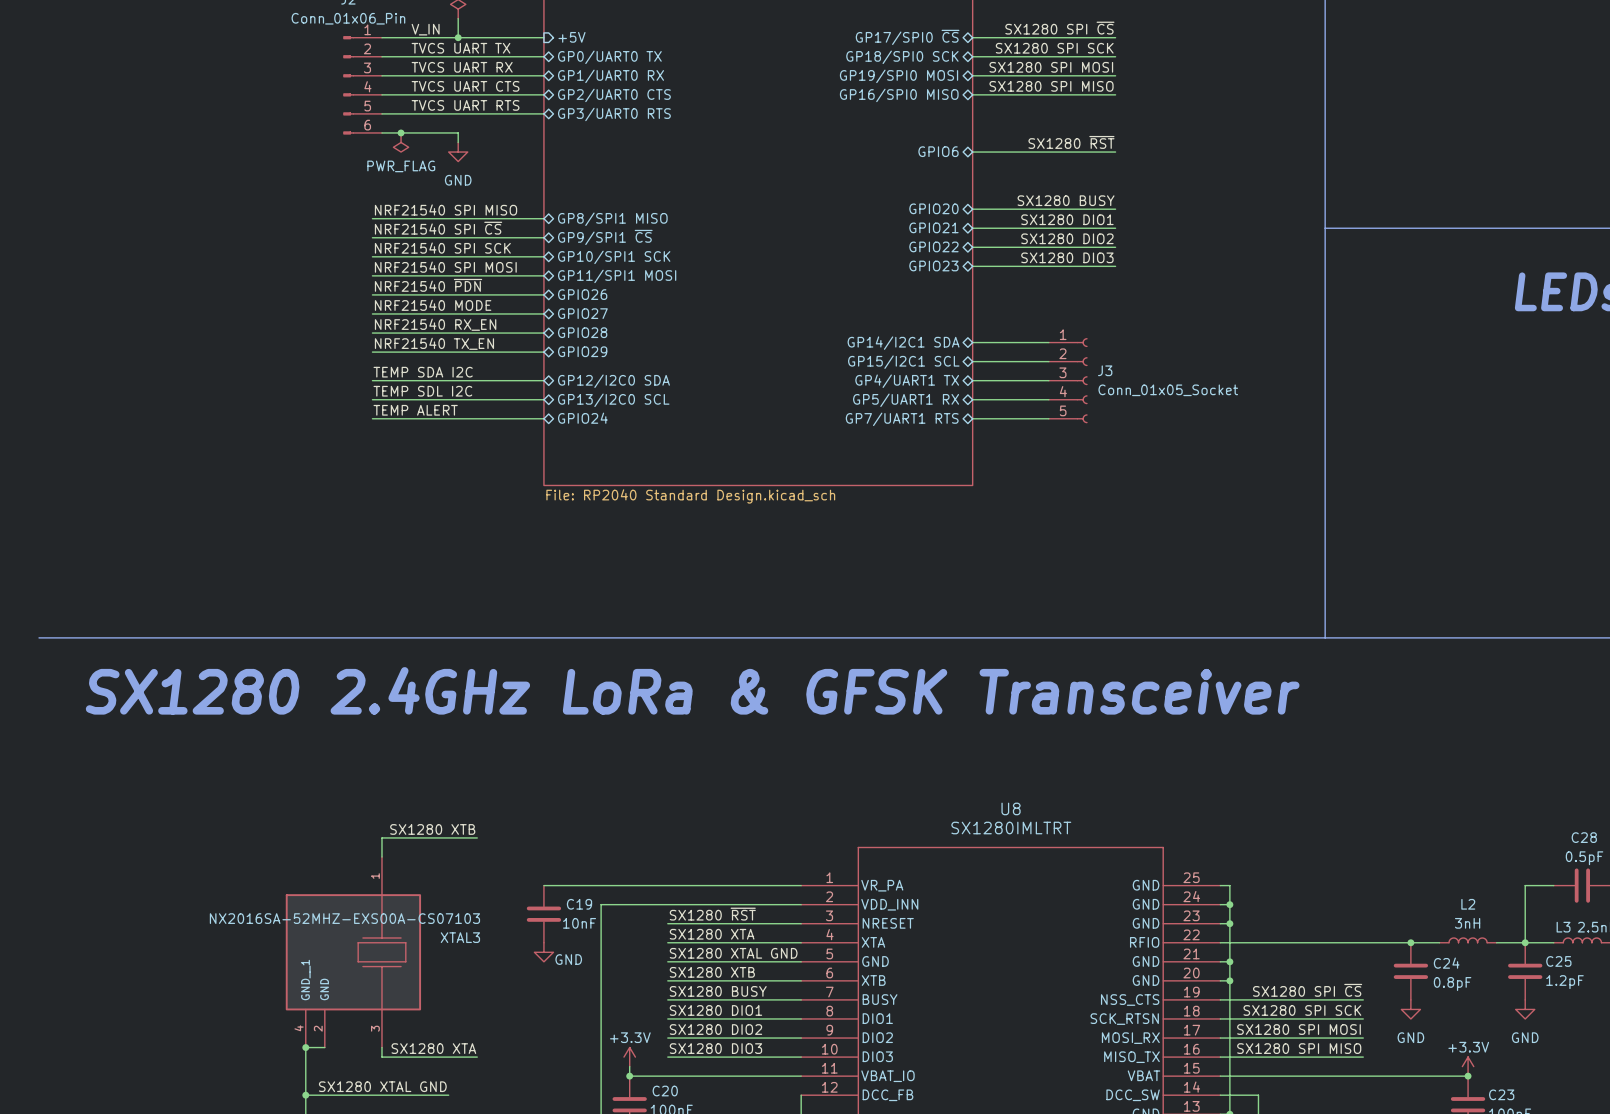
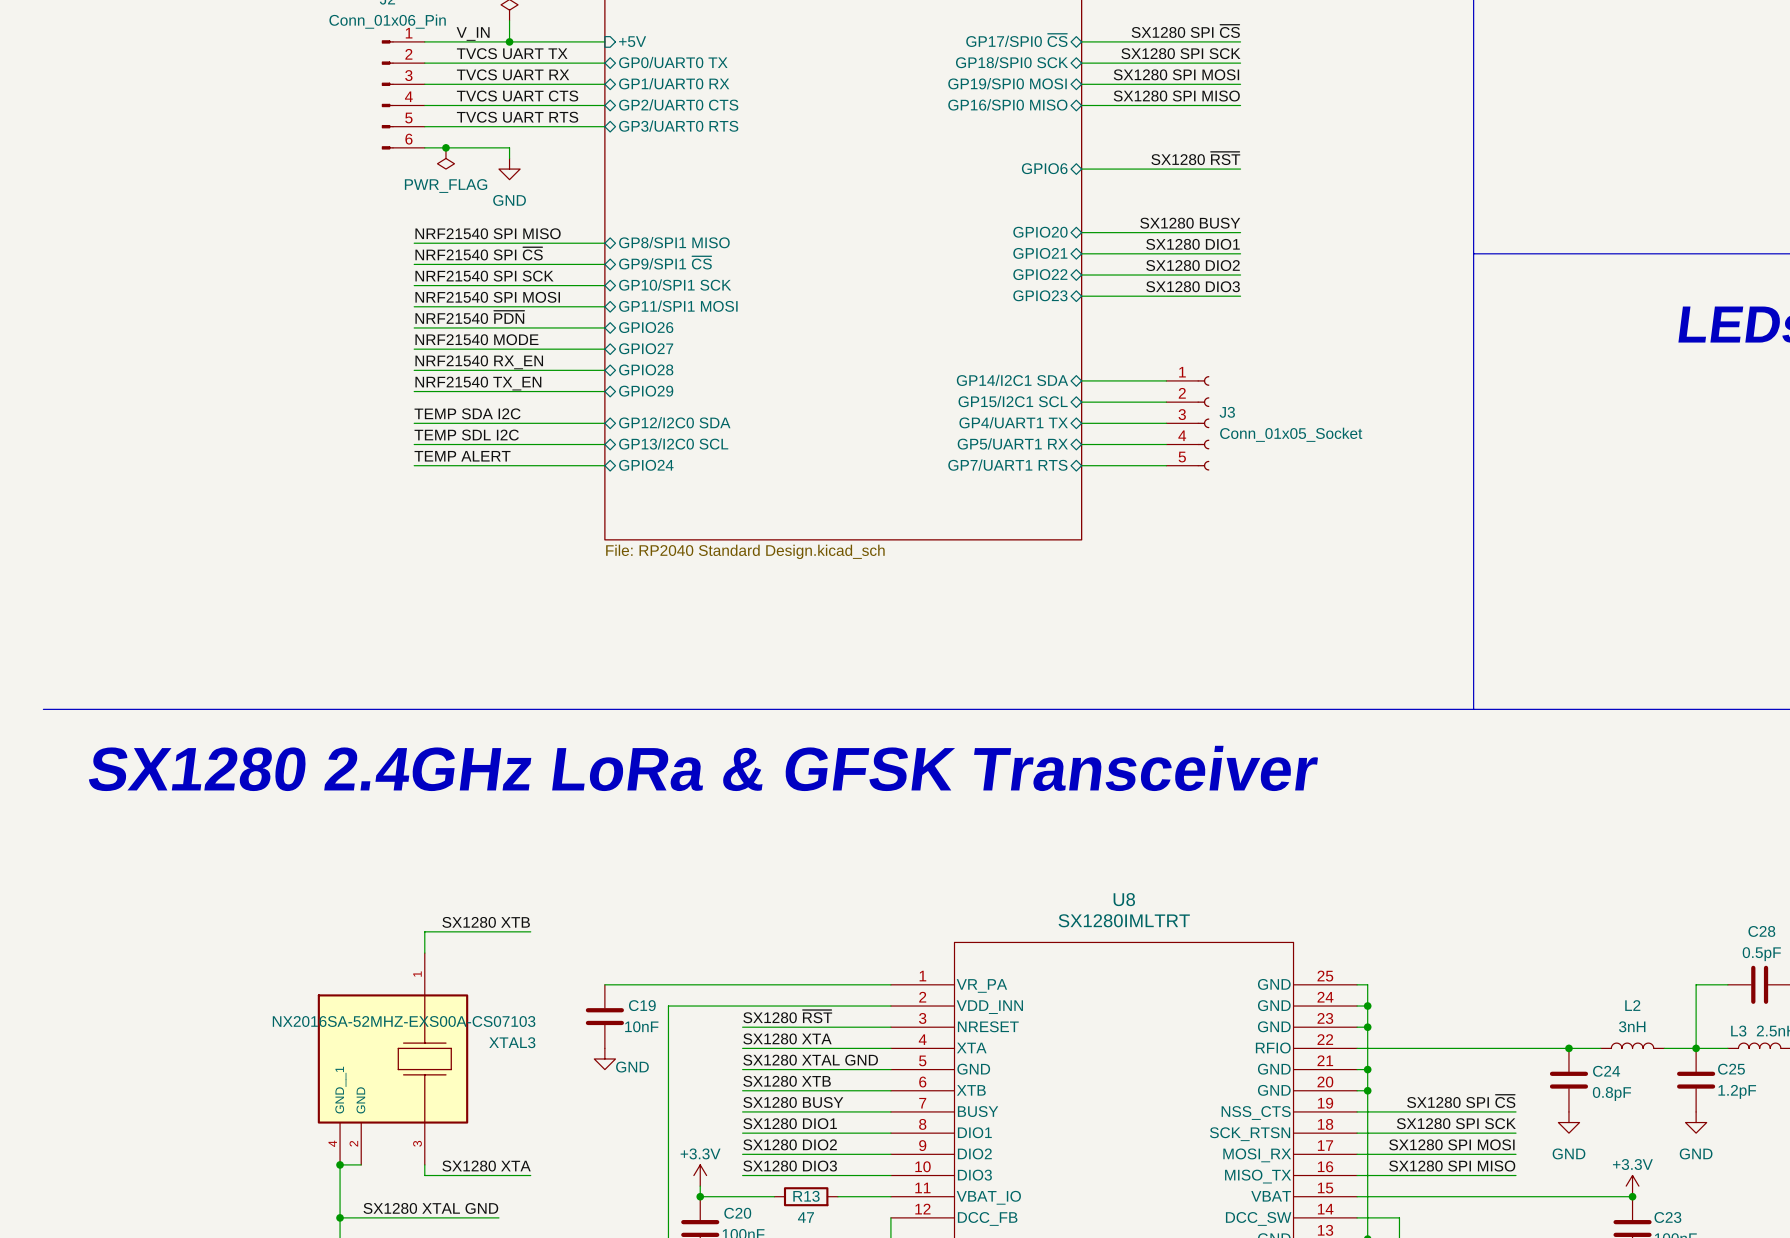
R13: none -> 47 (806, 1196)

